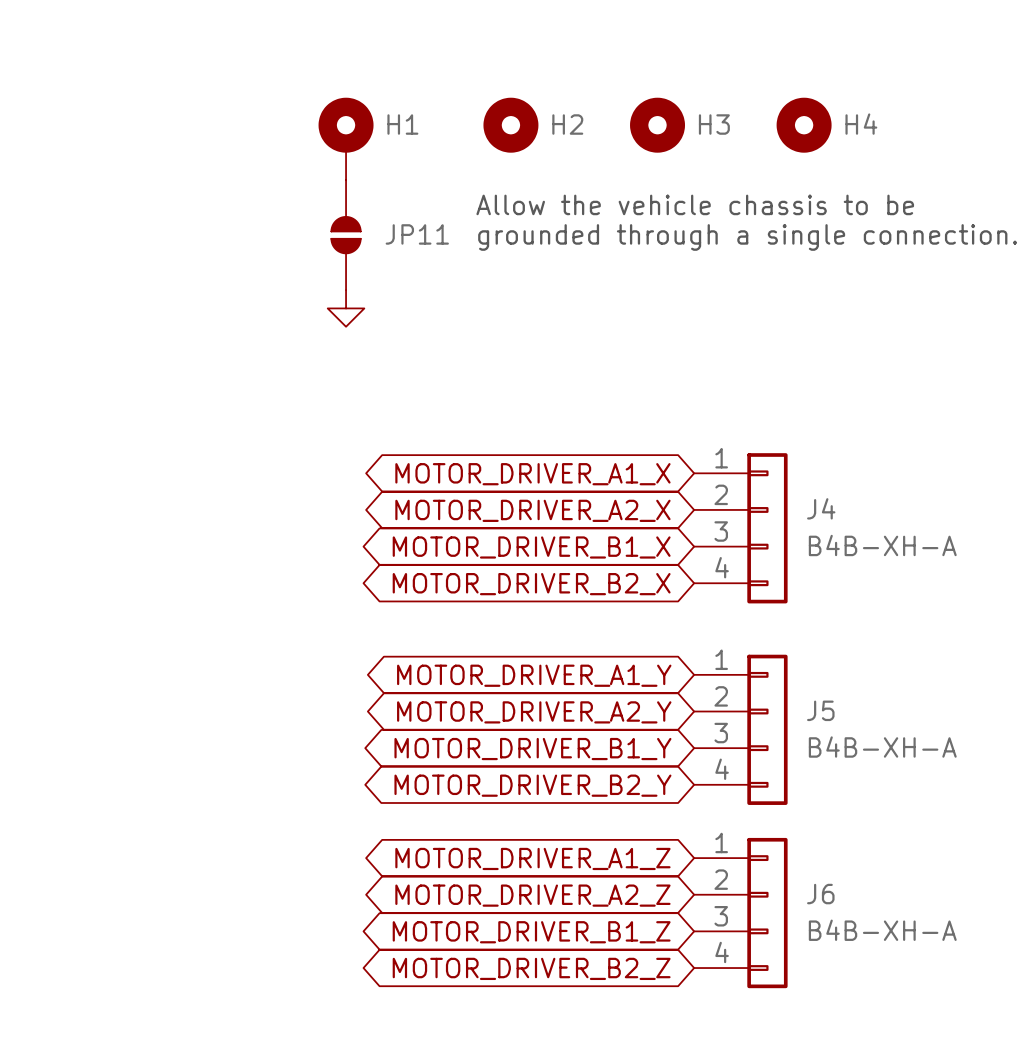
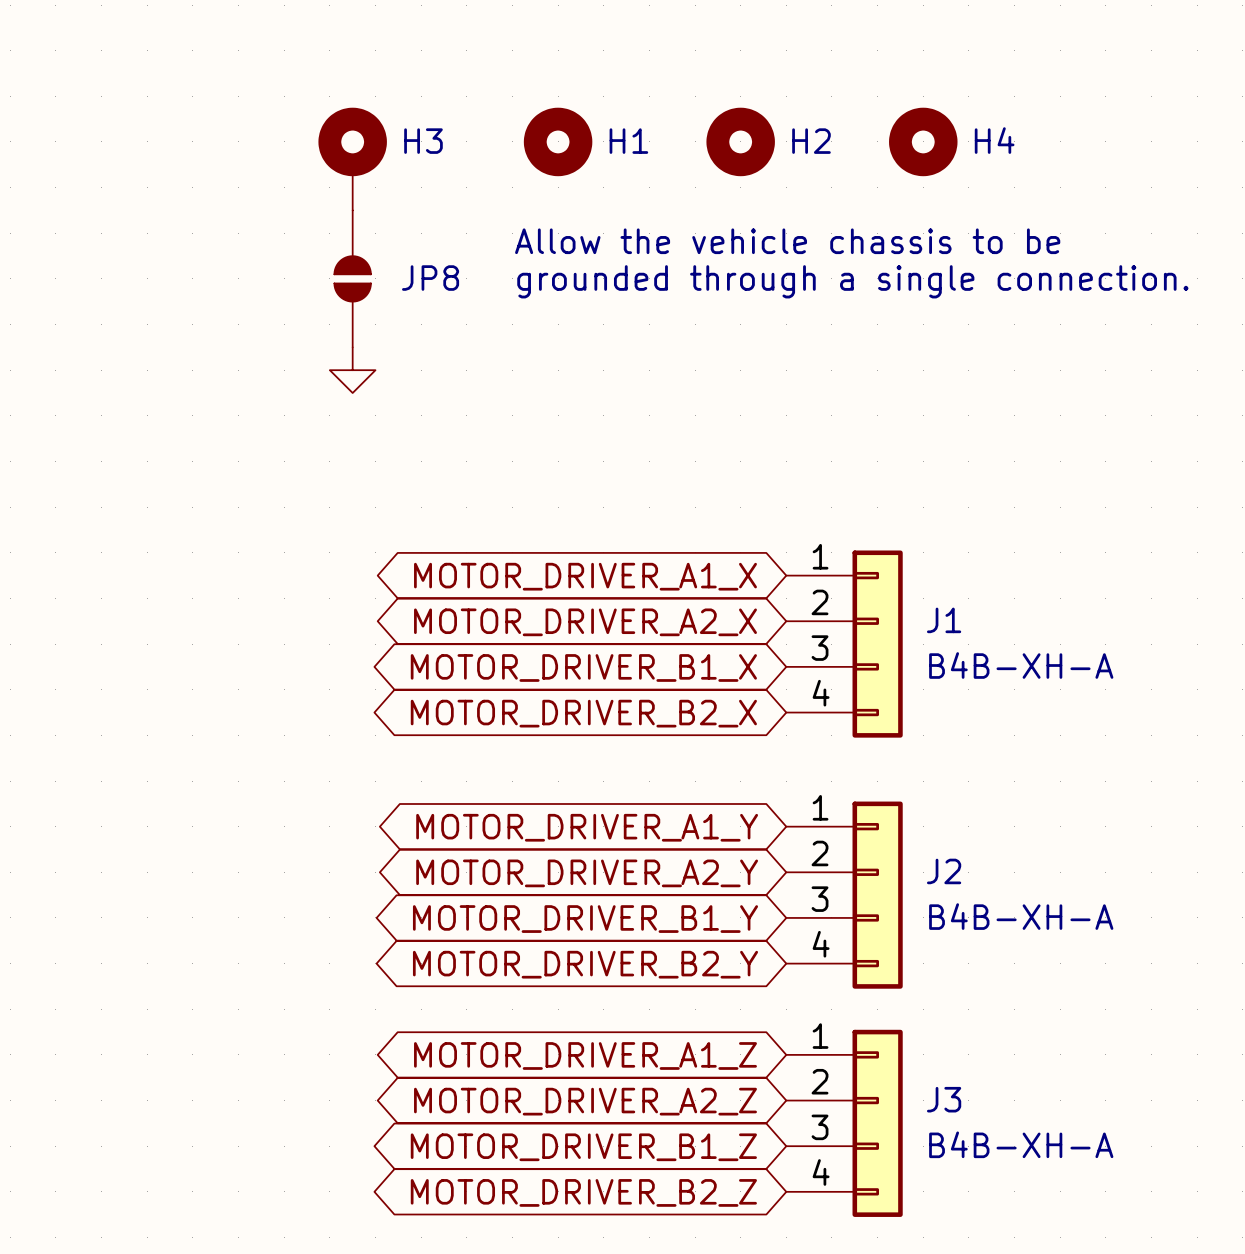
H1 name: H1 (402, 124) -> H3 (423, 141)
H2 name: H2 (567, 124) -> H1 (628, 141)
H3 name: H3 (714, 124) -> H2 (811, 141)
JP11 name: JP11 (417, 234) -> JP8 (430, 278)
J4 name: J4 (821, 508) -> J1 (944, 620)
J5 name: J5 (820, 710) -> J2 (944, 871)
J6 name: J6 (820, 894) -> J3 (944, 1099)

